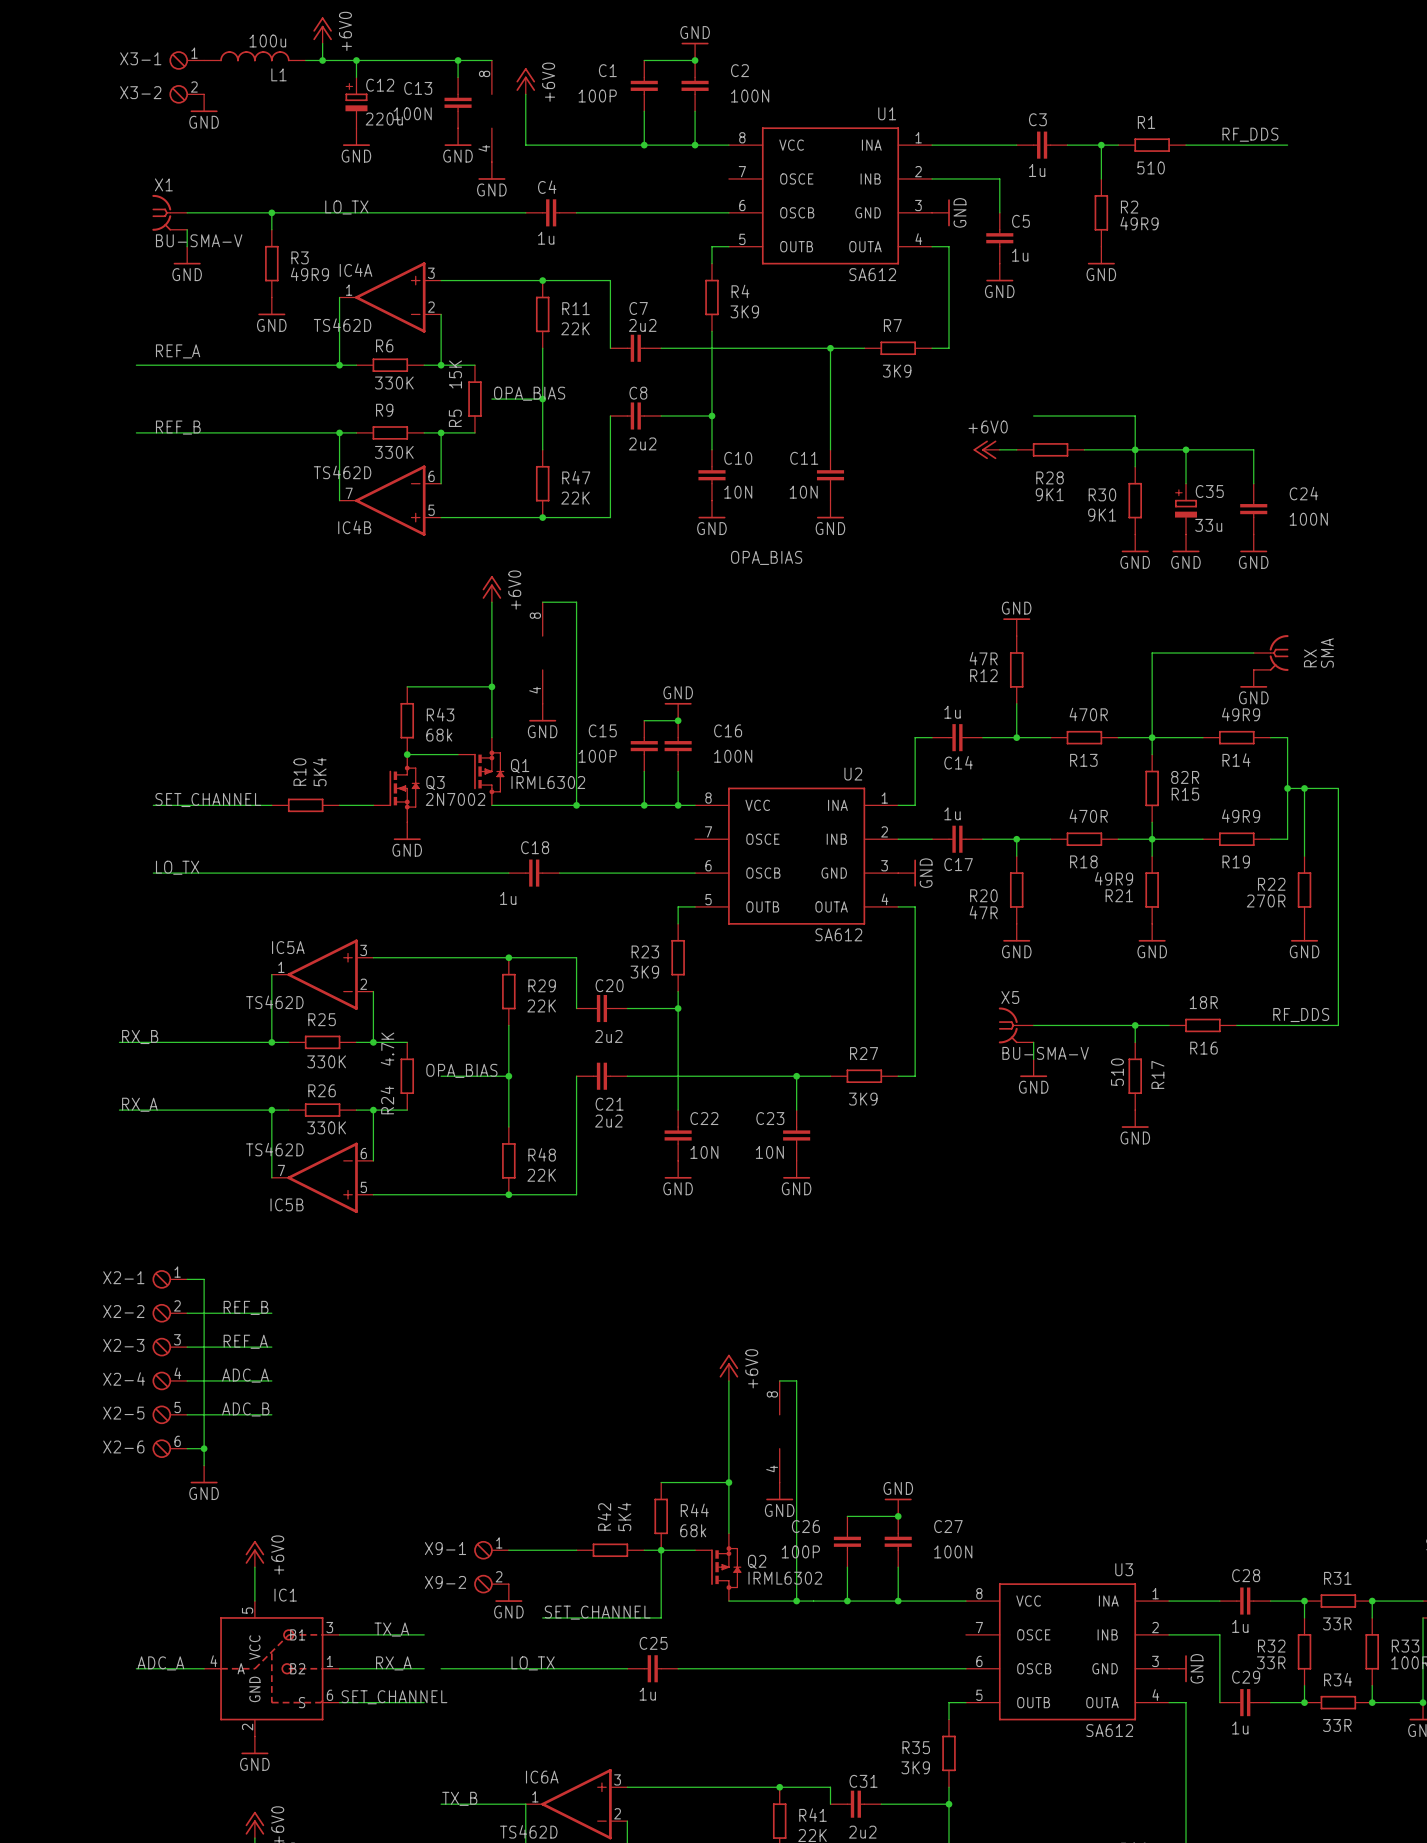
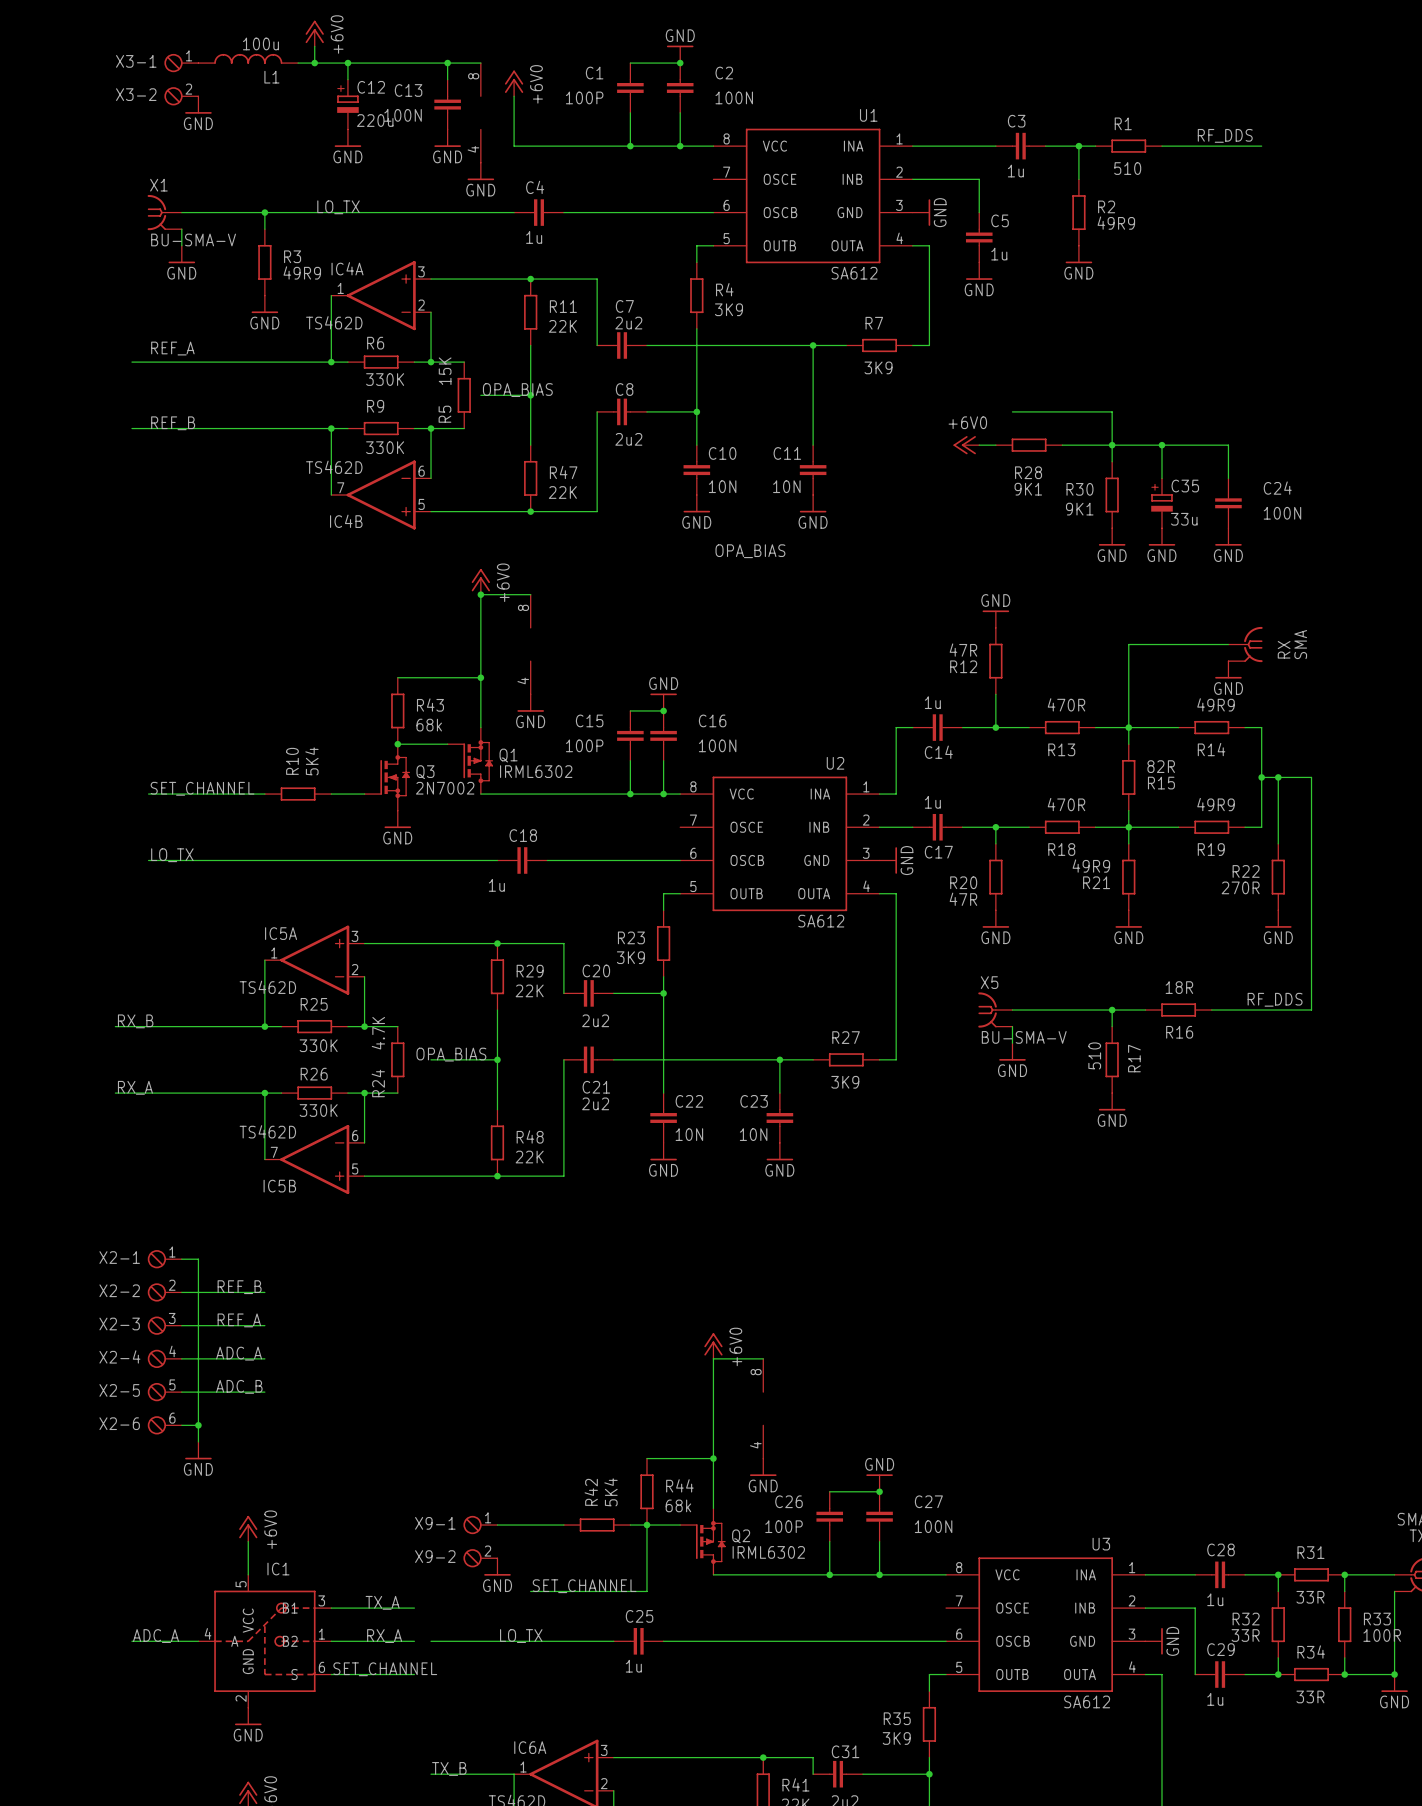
junction: none -> (480, 594)
wire: (542, 602) (576, 602) (576, 805) -> (530, 594) (480, 594)
junction: (576, 805) -> none
wire: (779, 1380) (796, 1380) (796, 1601) -> (763, 1358) (713, 1358)
junction: (796, 1601) -> none

